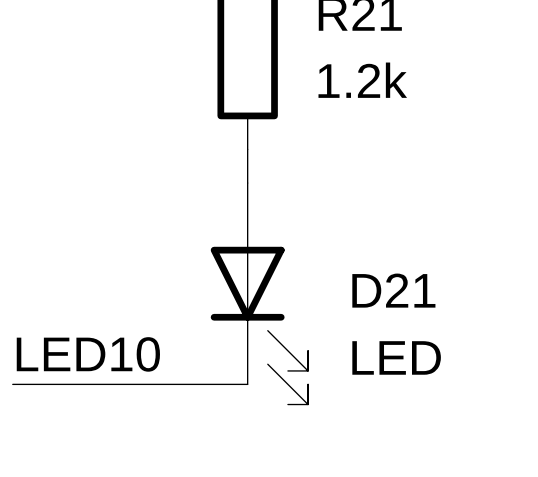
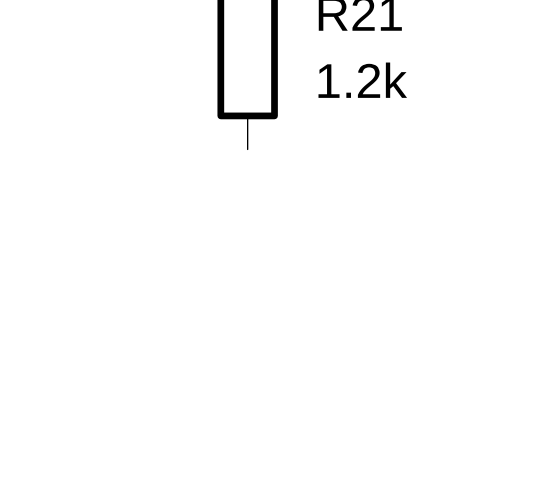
wire: (247, 149) (247, 183) -> none
D21: LED (259, 293) -> none
label: LED10 (88, 354) -> none
wire: (12, 384) (247, 384) -> none

